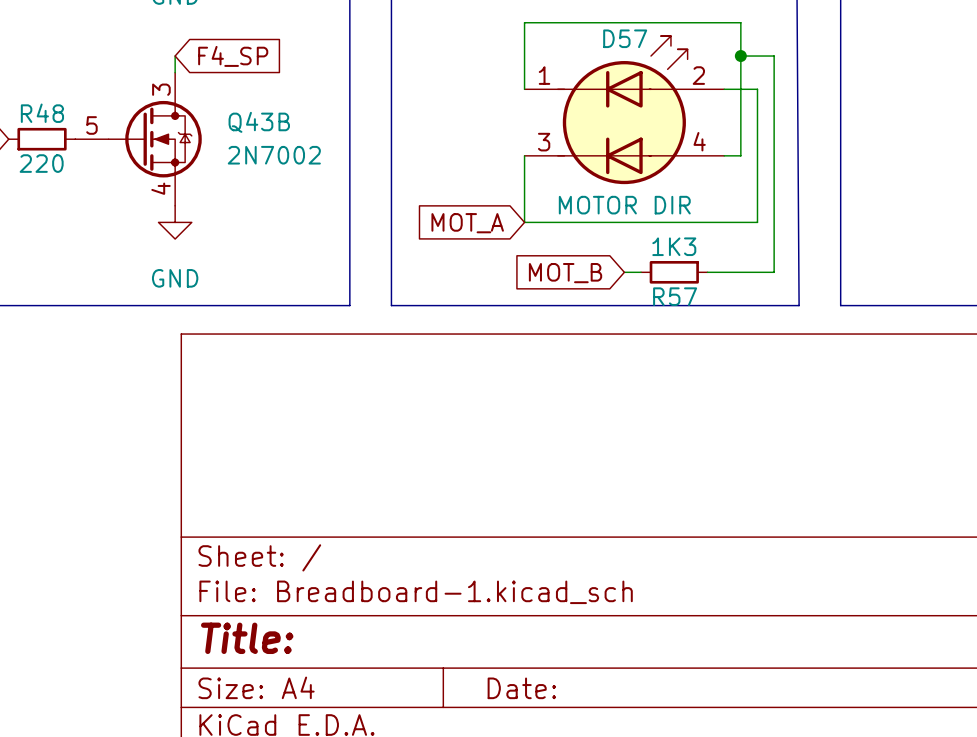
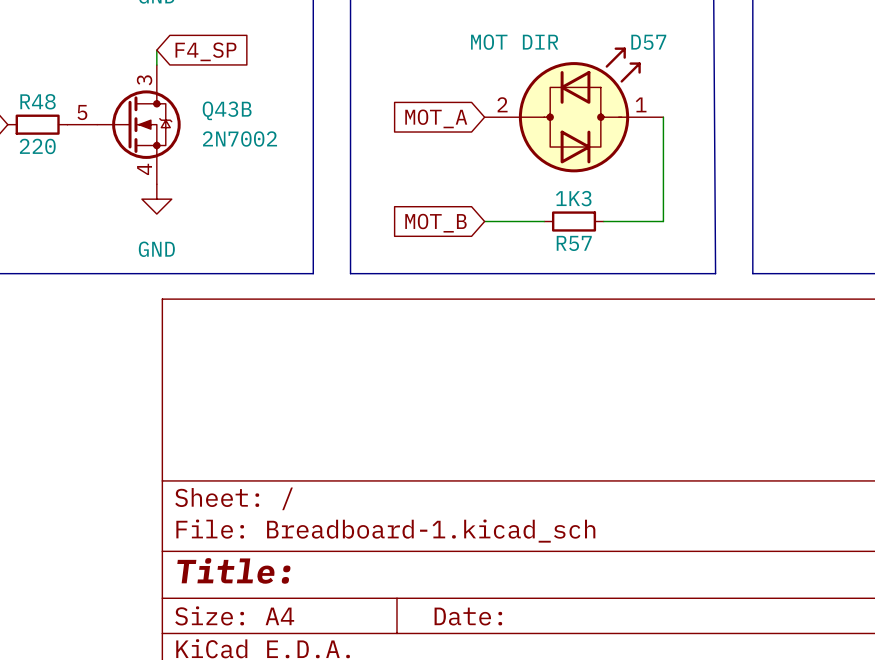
D57 symbol: [524, 36, 725, 185] -> [484, 47, 664, 173]
D57 name position: D57 (625, 38) -> D57 (648, 42)
wire: (740, 56) (774, 56) (774, 272) (707, 272) -> none
junction: (740, 56) -> none
wire: (524, 89) (524, 22) (740, 22) (740, 130) -> none
wire: (724, 89) (757, 89) (757, 222) (524, 222) (524, 155) -> none
wire: (724, 155) (740, 155) -> (603, 221) (663, 221) (663, 139)
D57 value: MOTOR DIR (624, 205) -> MOT DIR (514, 42)
global label position: MOT_A (467, 223) -> MOT_A (436, 118)
wire: none -> (484, 221) (544, 221)
wire: (624, 272) (641, 272) -> none
R57 position: (674, 272) -> (574, 221)
global label position: MOT_B (565, 273) -> MOT_B (435, 223)

